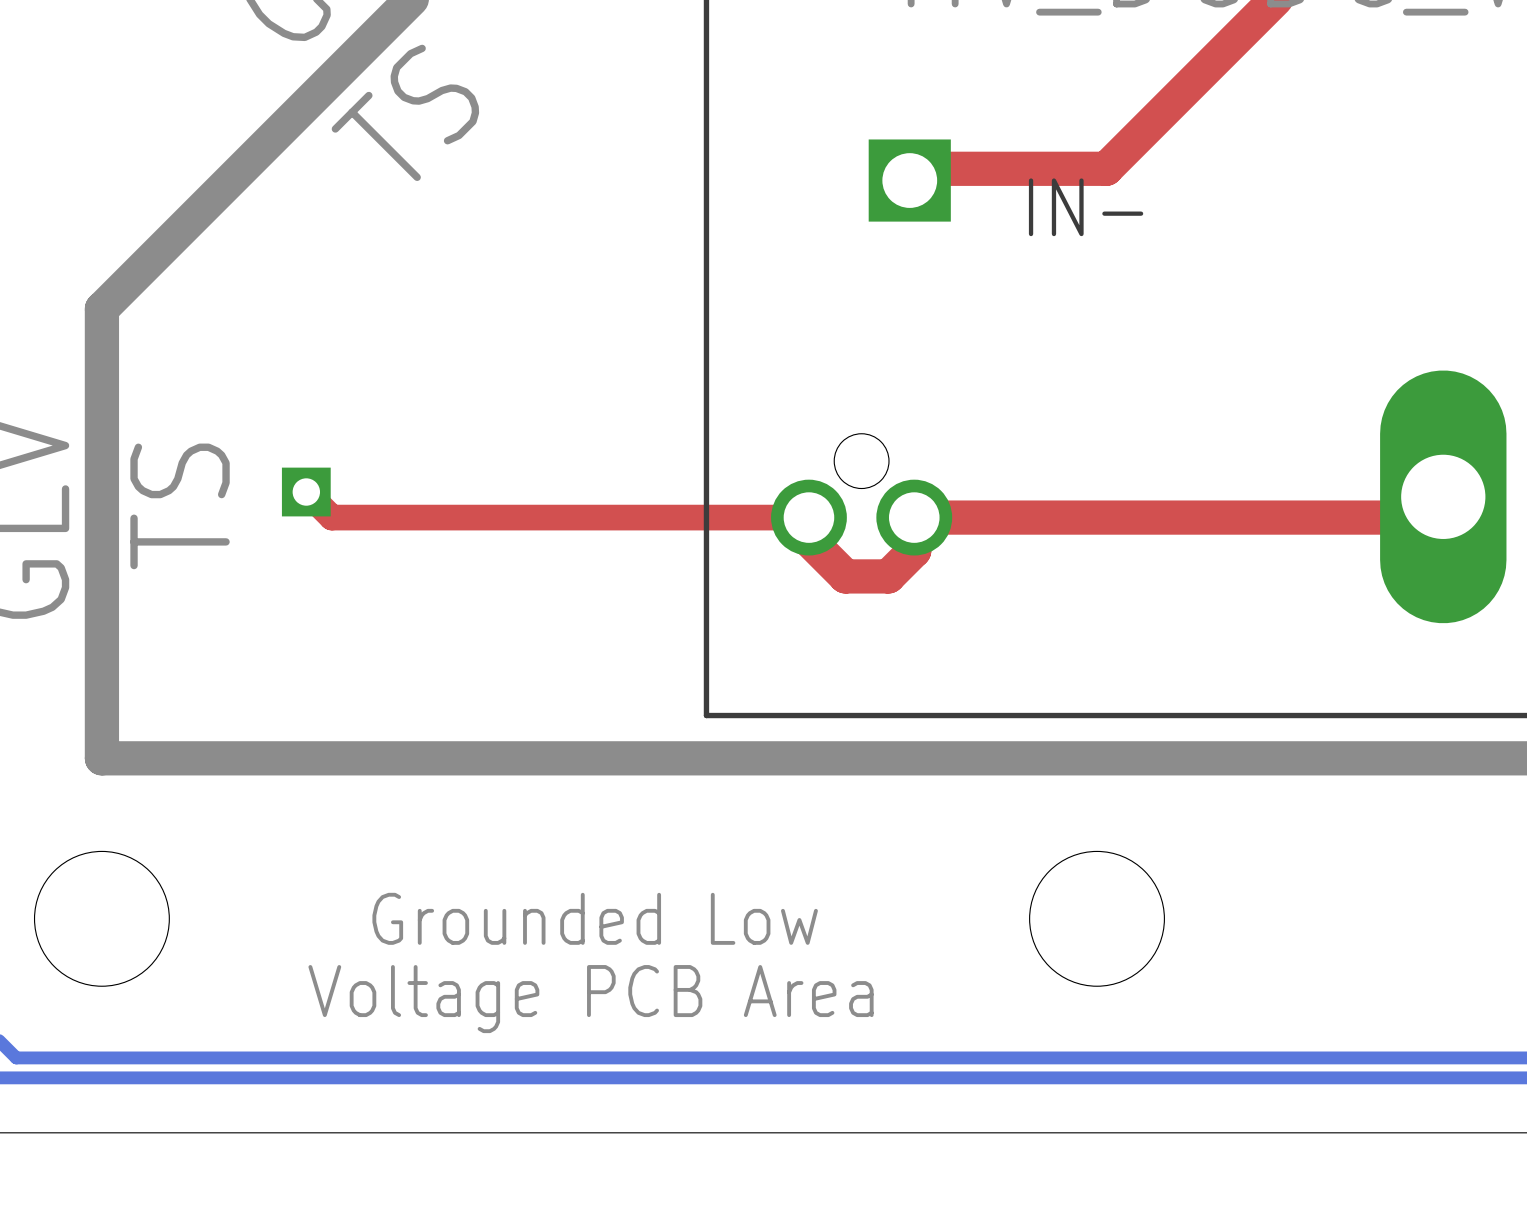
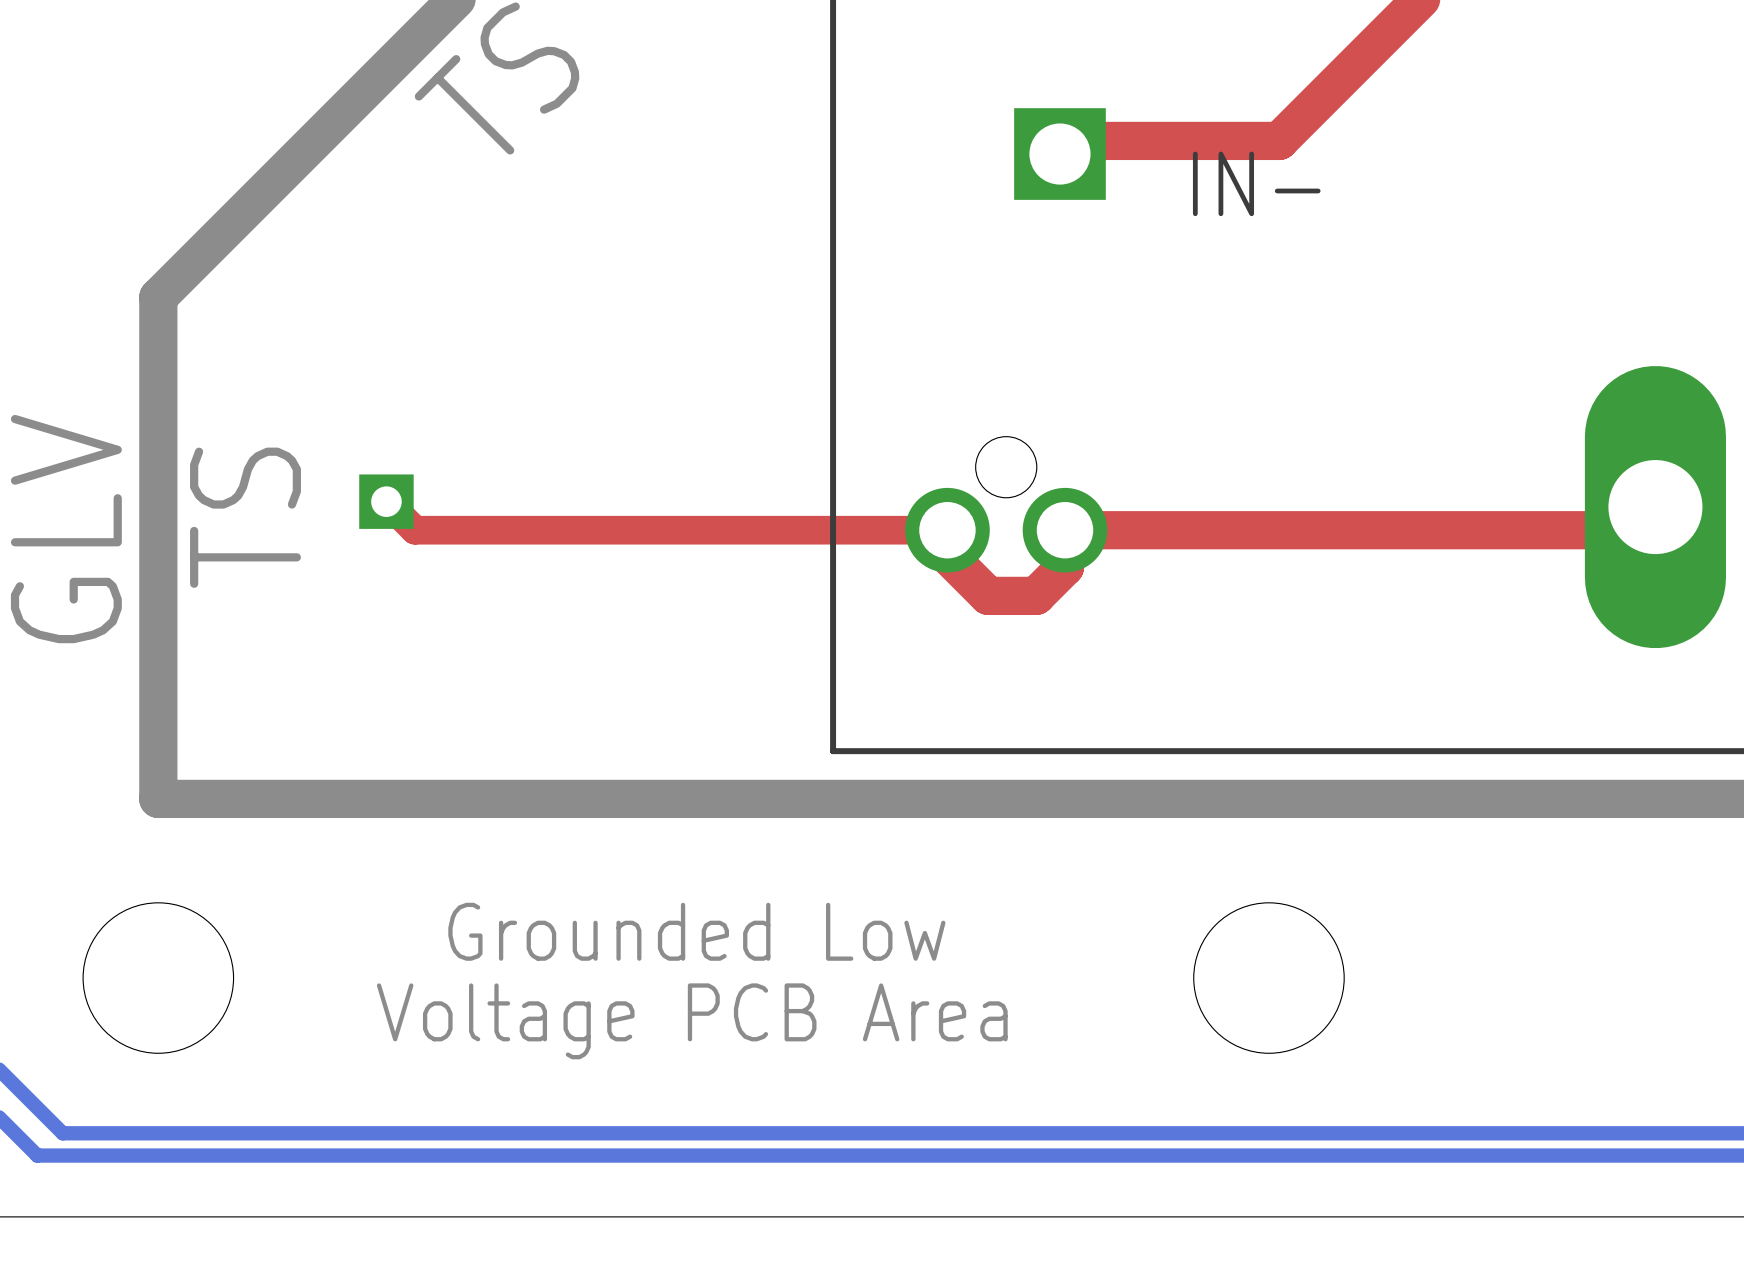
text position: Grounded Low (595, 918) -> Grounded Low (696, 931)
text position: Voltage PCB Area (591, 999) -> Voltage PCB Area (692, 1021)

